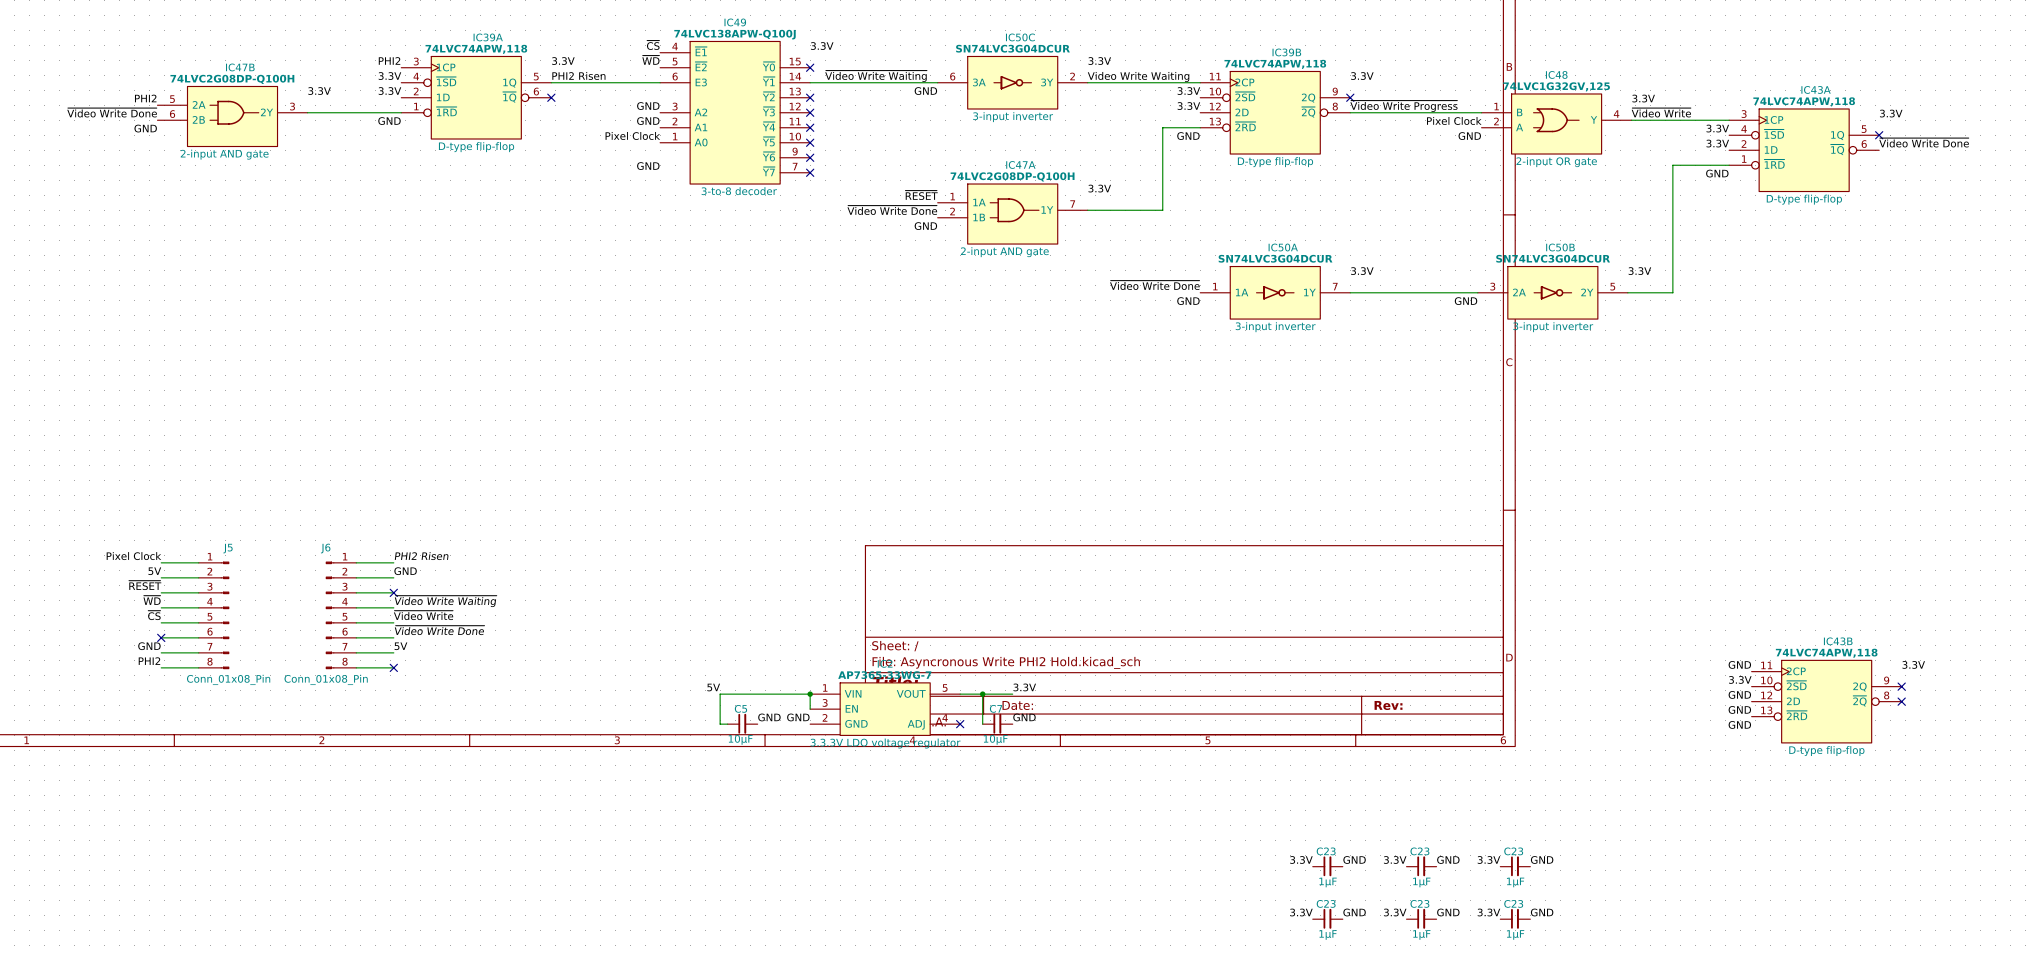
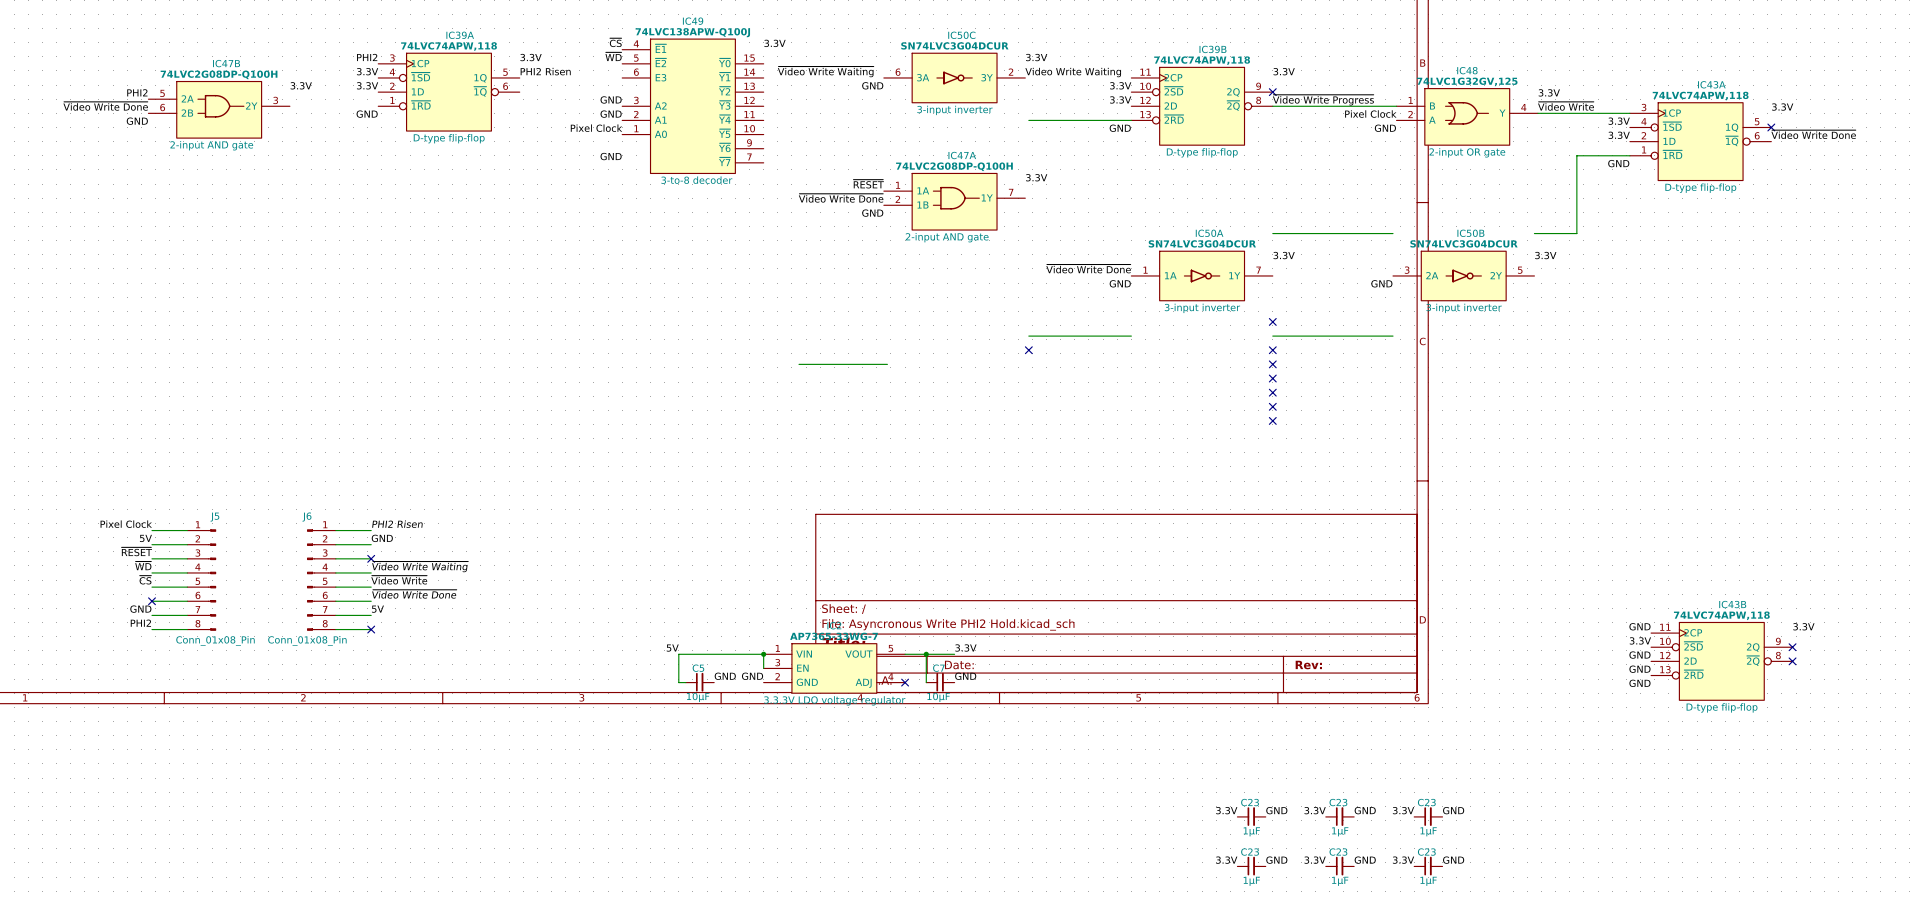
no-connect mark: (810, 67) -> none
wire: (551, 82) (660, 82) -> none
wire: (810, 82) (937, 82) -> none
wire: (1087, 82) (1200, 82) -> none
no-connect mark: (551, 97) -> none
no-connect mark: (810, 97) -> none
wire: (307, 112) (401, 112) -> none
no-connect mark: (810, 112) -> none
no-connect mark: (810, 127) -> none
wire: (1162, 127) (1162, 210) (1087, 210) -> (1096, 120) (1028, 120)
no-connect mark: (810, 142) -> none
no-connect mark: (810, 157) -> none
no-connect mark: (810, 172) -> none
wire: (1672, 247) (1672, 292) (1627, 292) -> (1576, 233) (1534, 233)
wire: (1350, 292) (1477, 292) -> (1272, 233) (1393, 233)
no-connect mark: none -> (1272, 321)
wire: none -> (1028, 336) (1131, 336)
wire: none -> (1272, 336) (1393, 336)
no-connect mark: none -> (1028, 350)
no-connect mark: none -> (1272, 350)
wire: none -> (799, 364) (887, 364)
no-connect mark: none -> (1272, 364)
no-connect mark: none -> (1272, 378)
no-connect mark: none -> (1272, 392)
no-connect mark: none -> (1272, 406)
no-connect mark: none -> (1272, 420)

